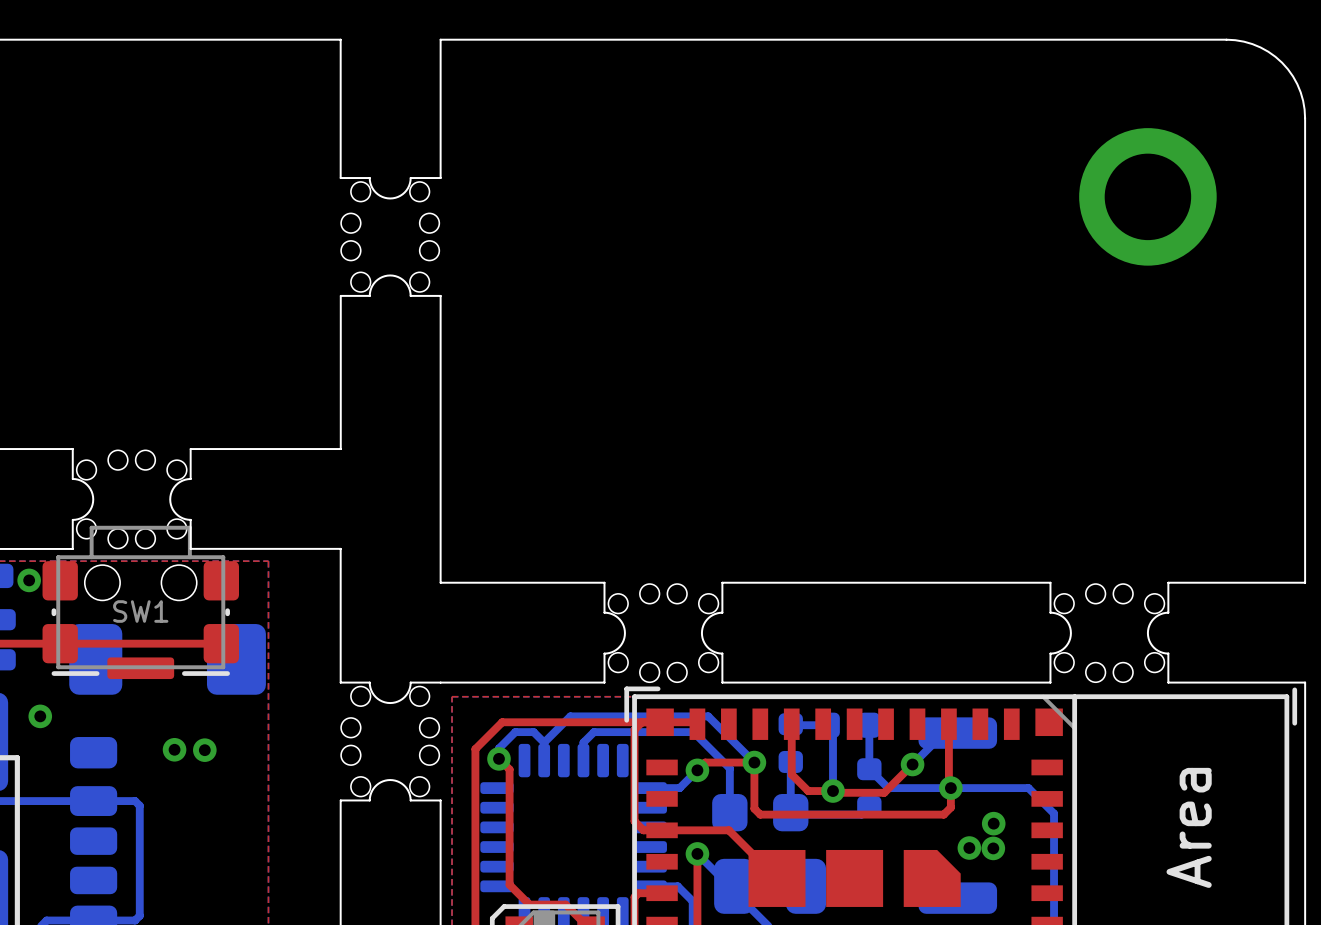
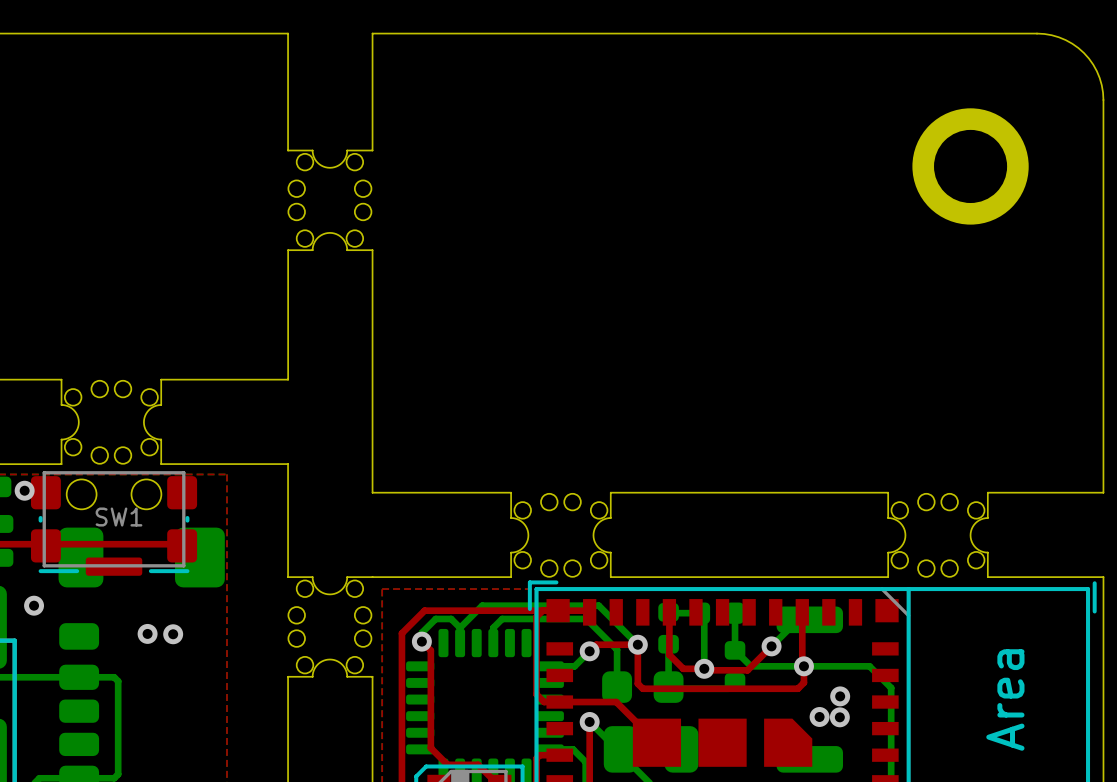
SW1 footprint: [42, 525, 240, 680] -> [30, 471, 198, 576]

